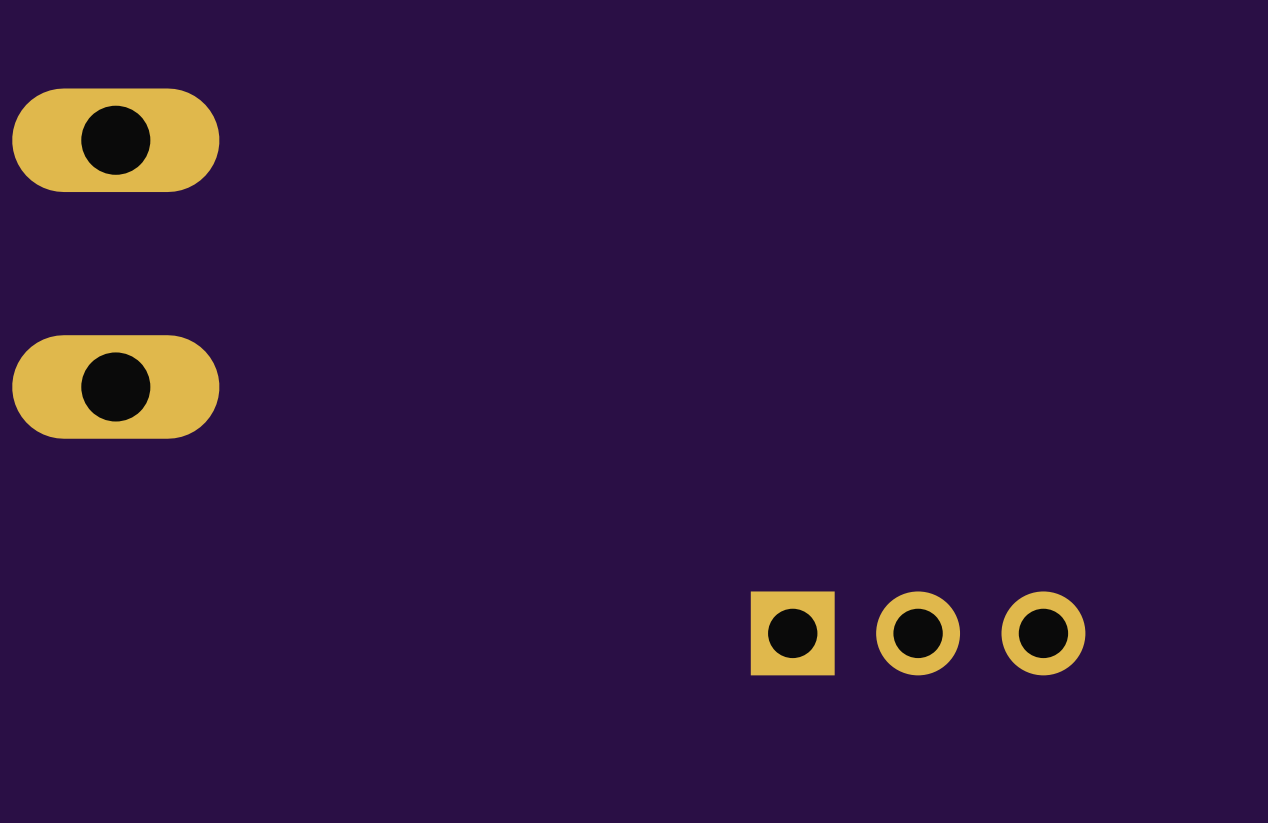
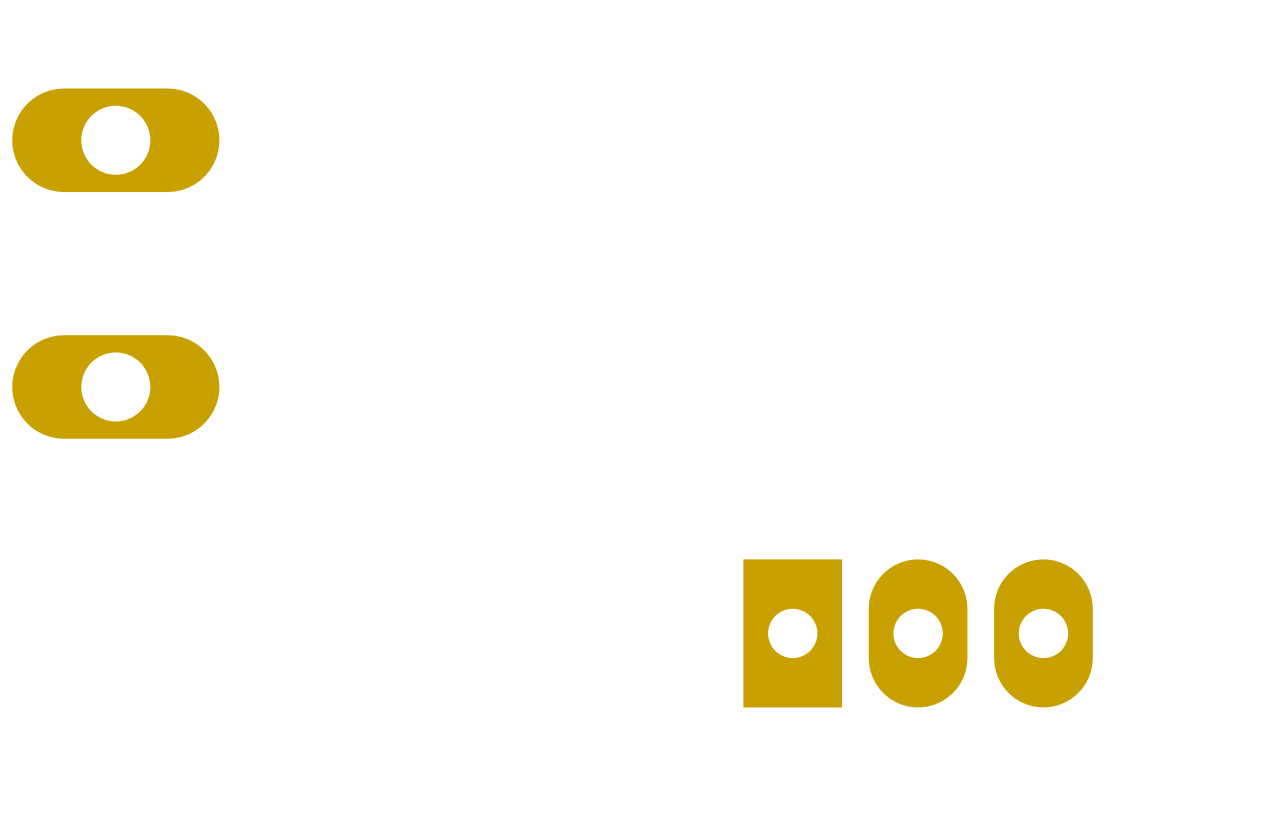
part footprint: [750, 591, 1086, 676] -> [743, 559, 1093, 708]

